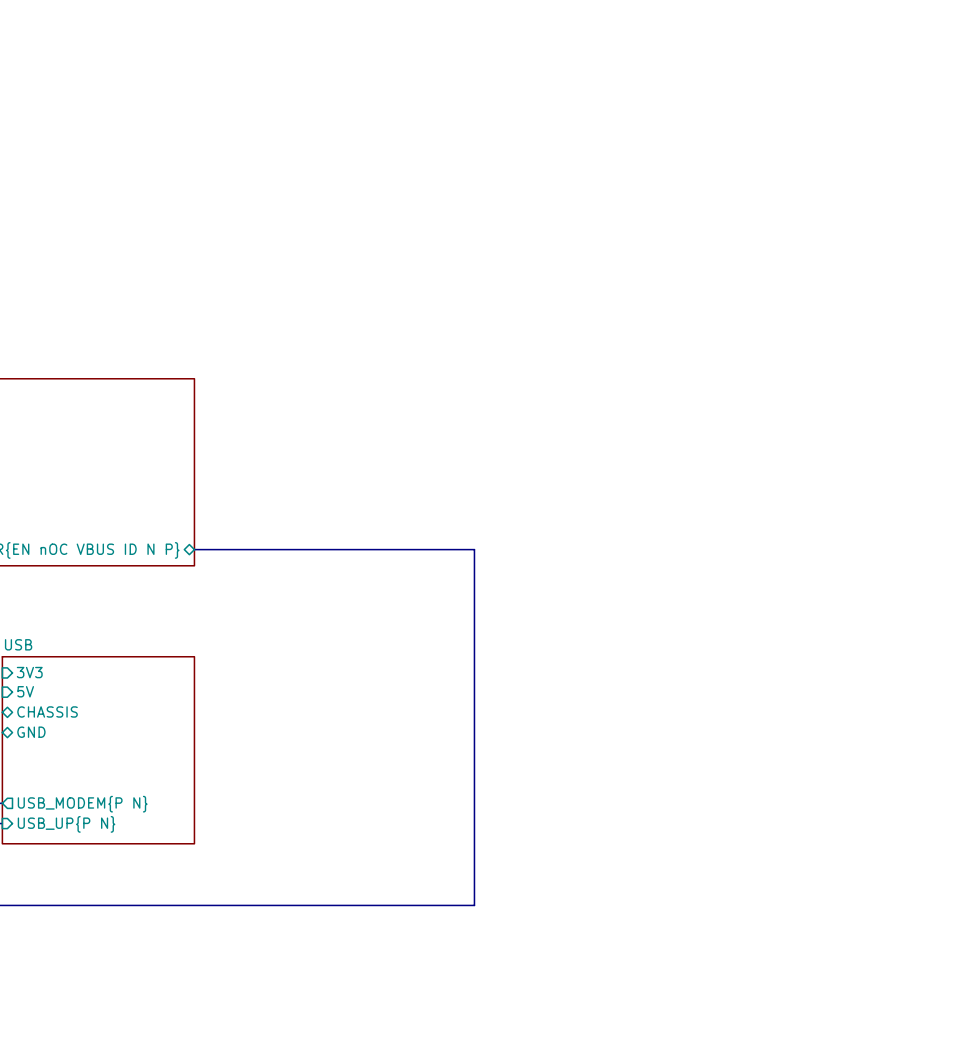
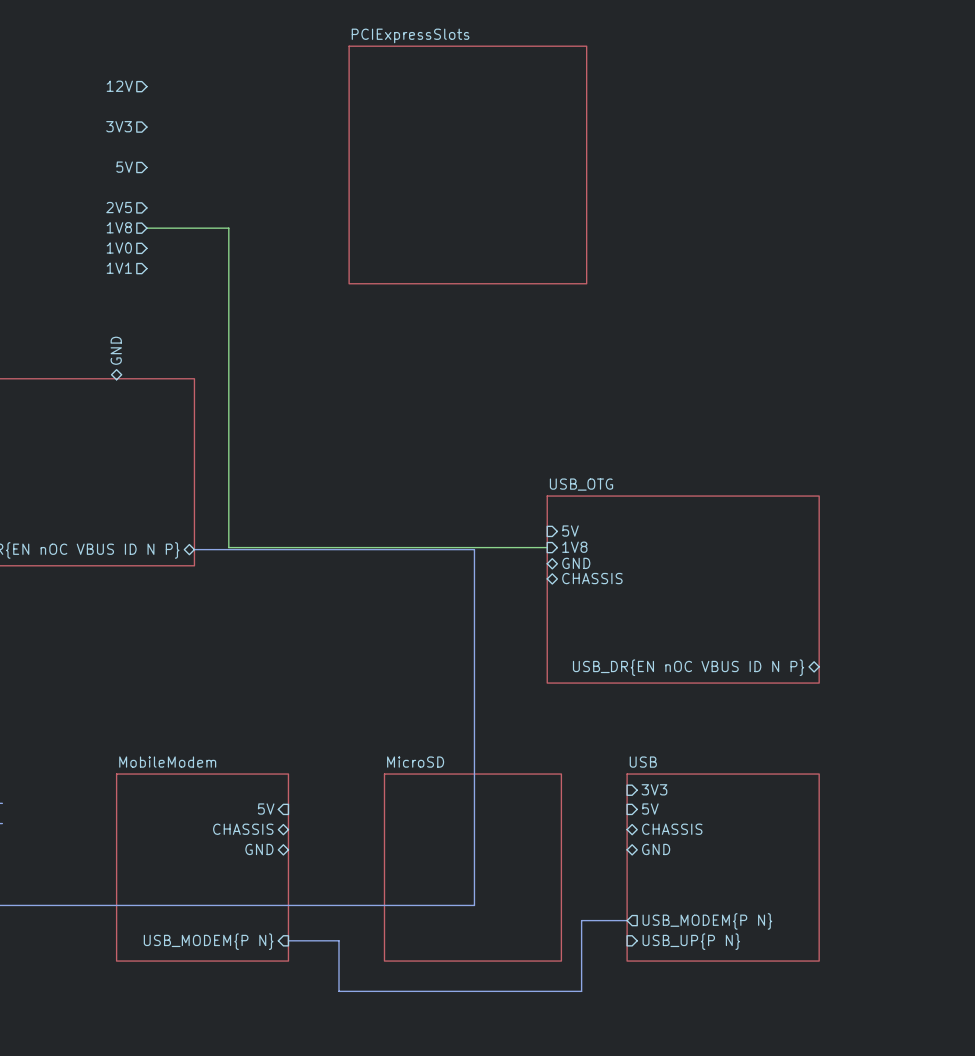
sheet pin: none -> 12V (119, 86)
sheet pin: none -> 3V3 (119, 126)
sheet PCIExpressSlots: none -> (467, 164)
sheet pin: none -> 5V (124, 167)
sheet pin: none -> 2V5 (119, 207)
sheet pin: none -> 1V8 (119, 227)
wire: none -> (146, 228) (228, 228) (228, 547) (547, 547)
sheet pin: none -> 1V0 (119, 247)
sheet pin: none -> 1V1 (119, 268)
sheet pin: none -> GND (116, 350)
sheet pin: none -> 5V (570, 531)
sheet pin: none -> 1V8 (574, 547)
sheet pin: none -> GND (576, 563)
sheet pin: none -> CHASSIS (592, 578)
sheet USB_OTG: none -> (683, 589)
sheet pin: none -> USB_DR{EN nOC VBUS ID N P} (688, 667)
sheet pin: 3V3 (29, 672) -> none
sheet pin: 5V (25, 691) -> none
sheet pin: CHASSIS (47, 711) -> none
sheet pin: GND (31, 732) -> none
sheet USB: (98, 750) -> none
sheet pin: none -> 3V3 (654, 789)
sheet pin: USB_MODEM{P N} (82, 804) -> none
sheet pin: none -> 5V (266, 809)
sheet pin: none -> 5V (650, 809)
sheet pin: USB_UP{P N} (66, 824) -> none
sheet pin: none -> CHASSIS (243, 829)
sheet pin: none -> CHASSIS (672, 829)
sheet pin: none -> GND (259, 849)
sheet pin: none -> GND (656, 849)
sheet MobileModem: none -> (202, 867)
sheet MicroSD: none -> (472, 867)
sheet USB: none -> (723, 867)
bus: none -> (627, 920) (581, 920) (581, 991) (339, 991) (339, 940) (288, 940)
sheet pin: none -> USB_MODEM{P N} (707, 921)
sheet pin: none -> USB_MODEM{P N} (208, 941)
sheet pin: none -> USB_UP{P N} (691, 941)

